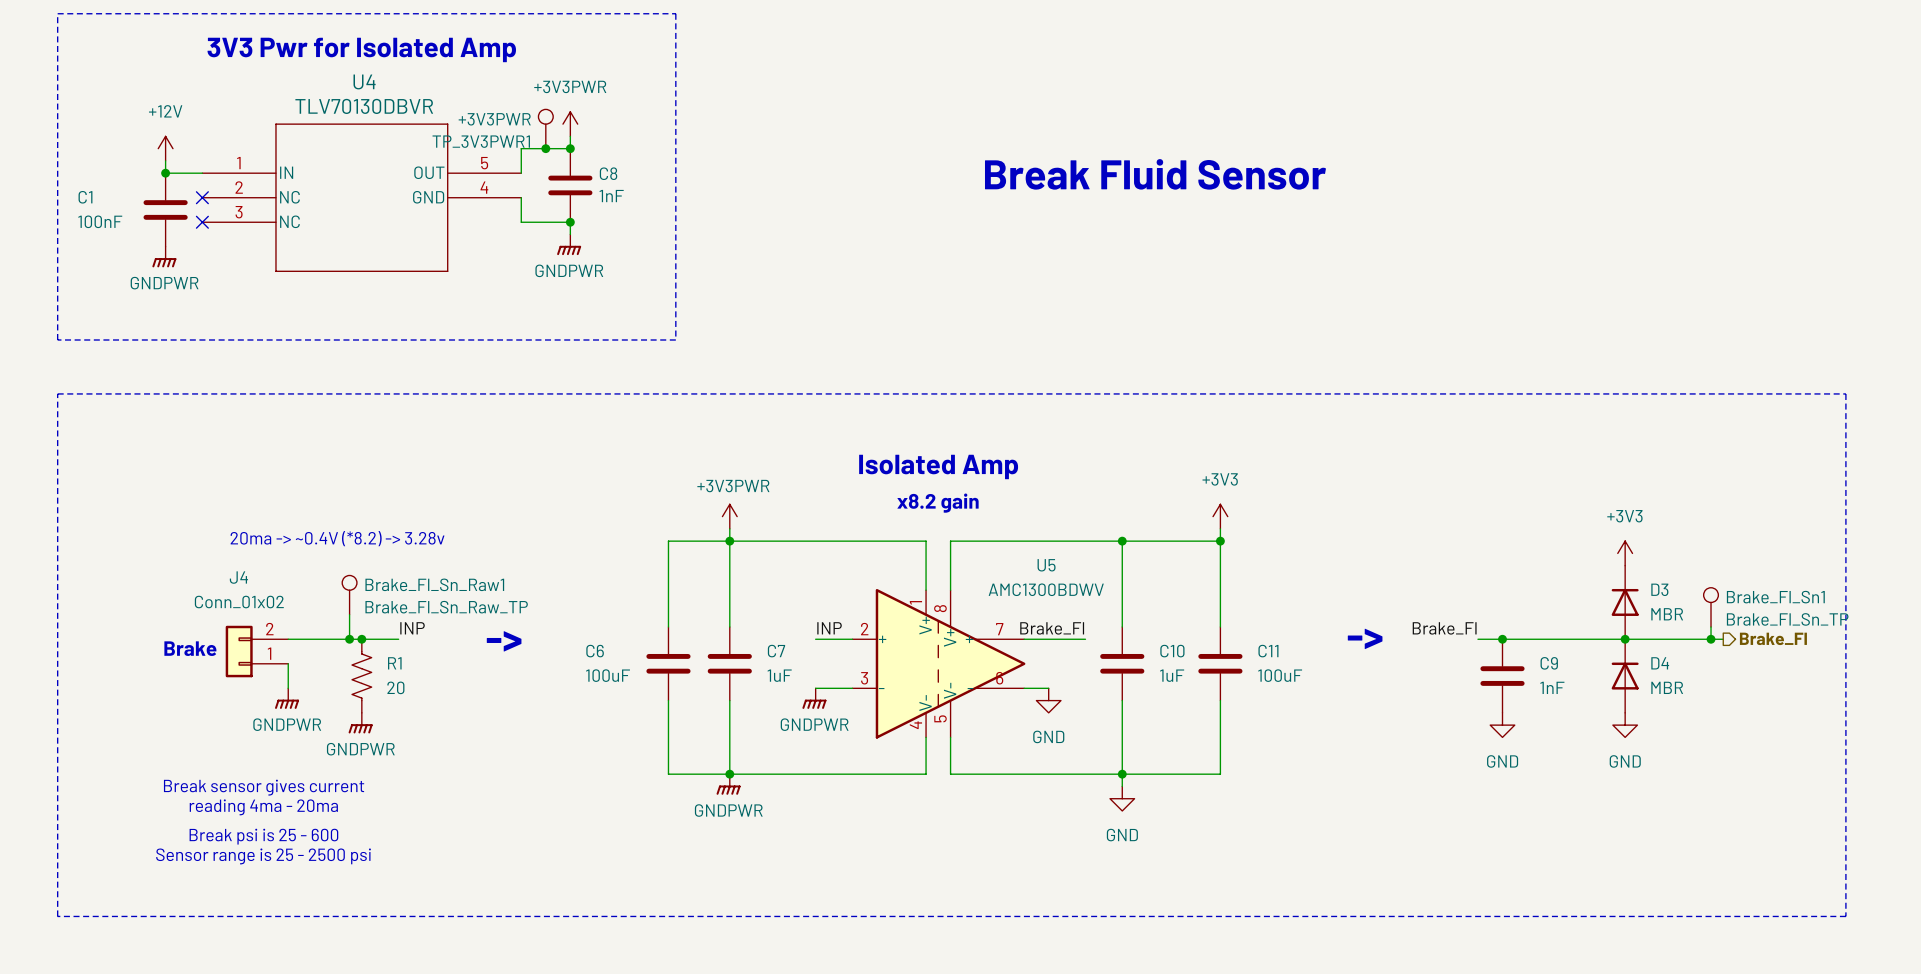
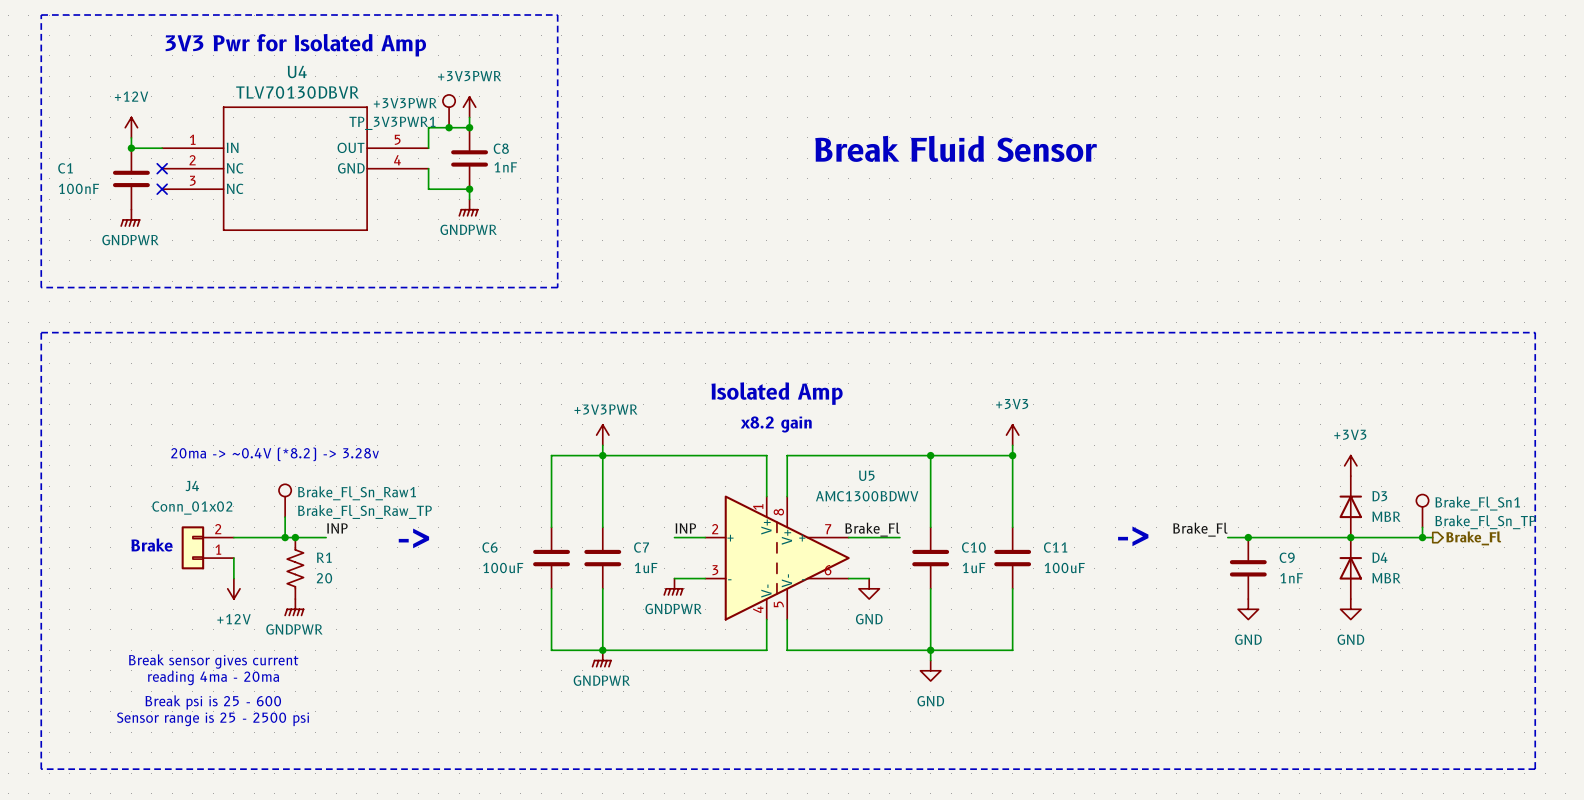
power symbol: GNDPWR (287, 698) -> +12V (233, 588)

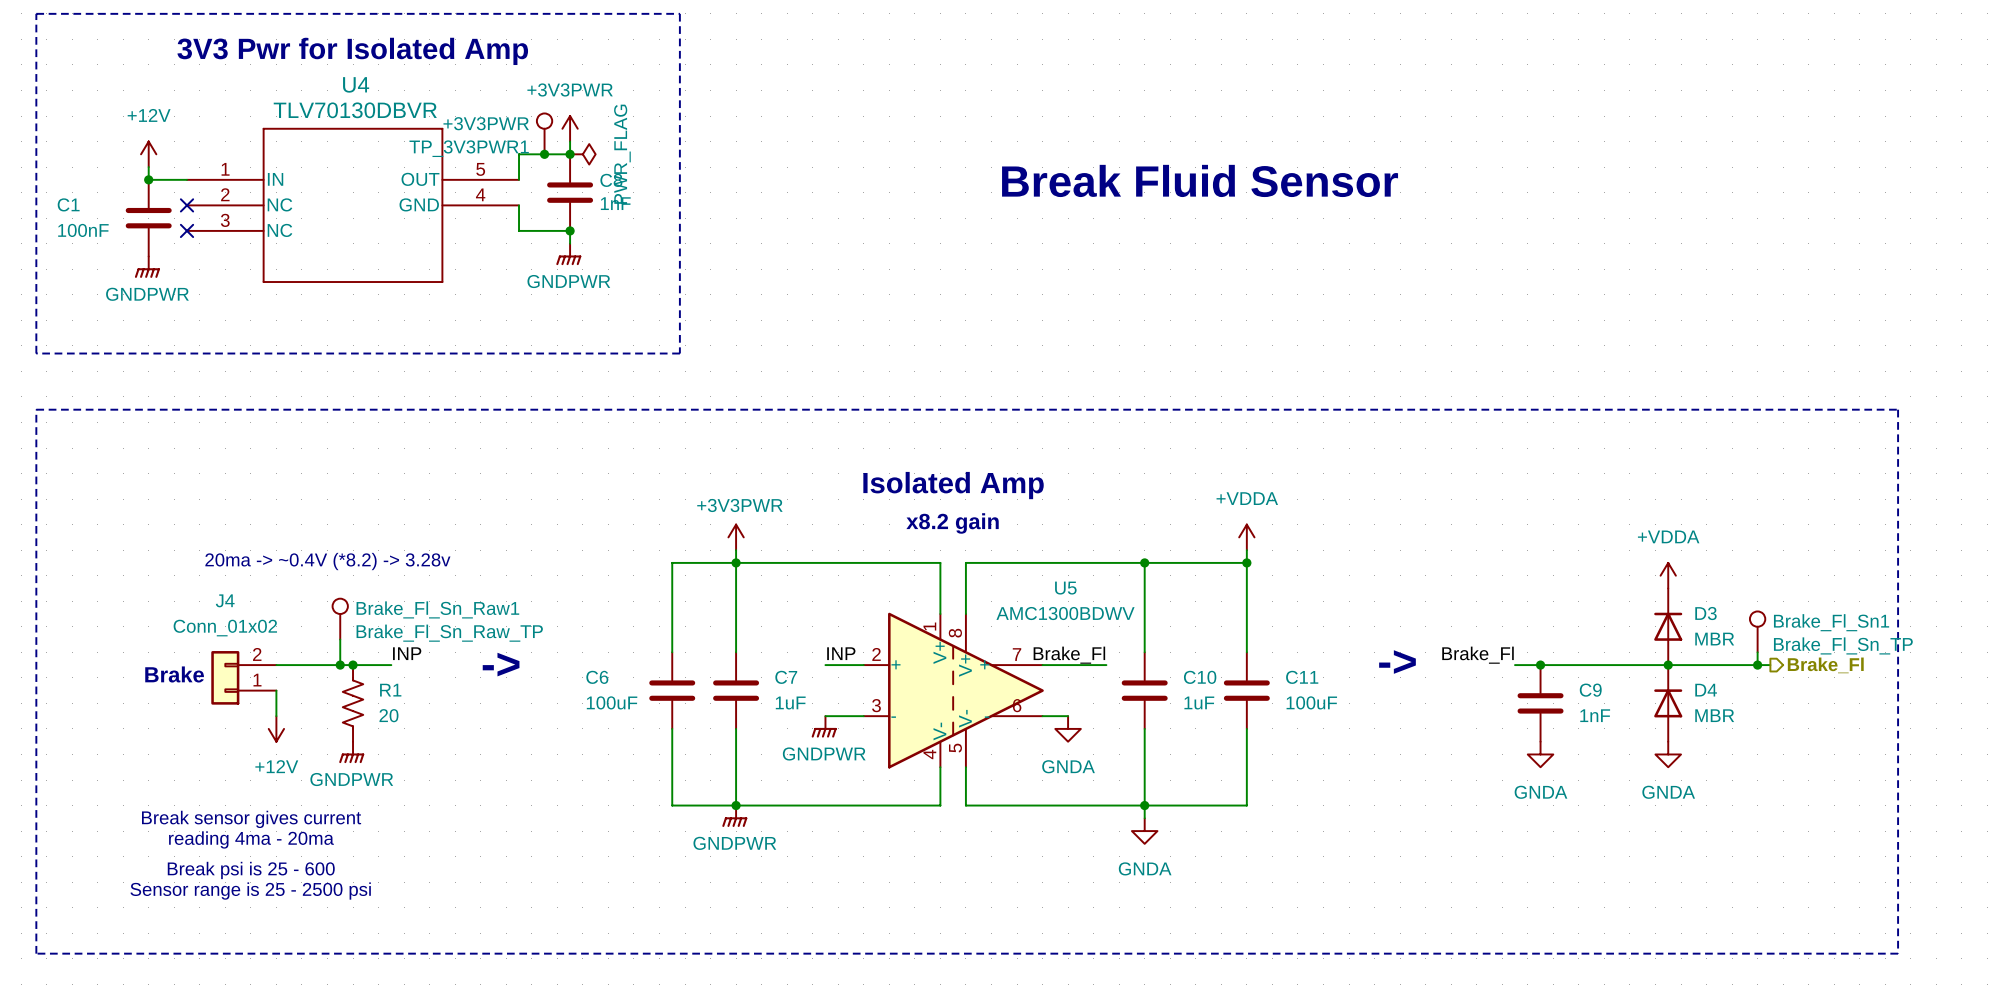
power symbol: none -> PWR_FLAG (582, 154)
power symbol: +3V3 (1012, 435) -> +VDDA (1246, 537)
power symbol: +3V3 (1350, 465) -> +VDDA (1668, 575)
power symbol: GND (869, 588) -> GNDA (1068, 728)
power symbol: GND (1248, 609) -> GNDA (1540, 754)
power symbol: GND (1350, 609) -> GNDA (1668, 754)
power symbol: GND (930, 670) -> GNDA (1144, 831)

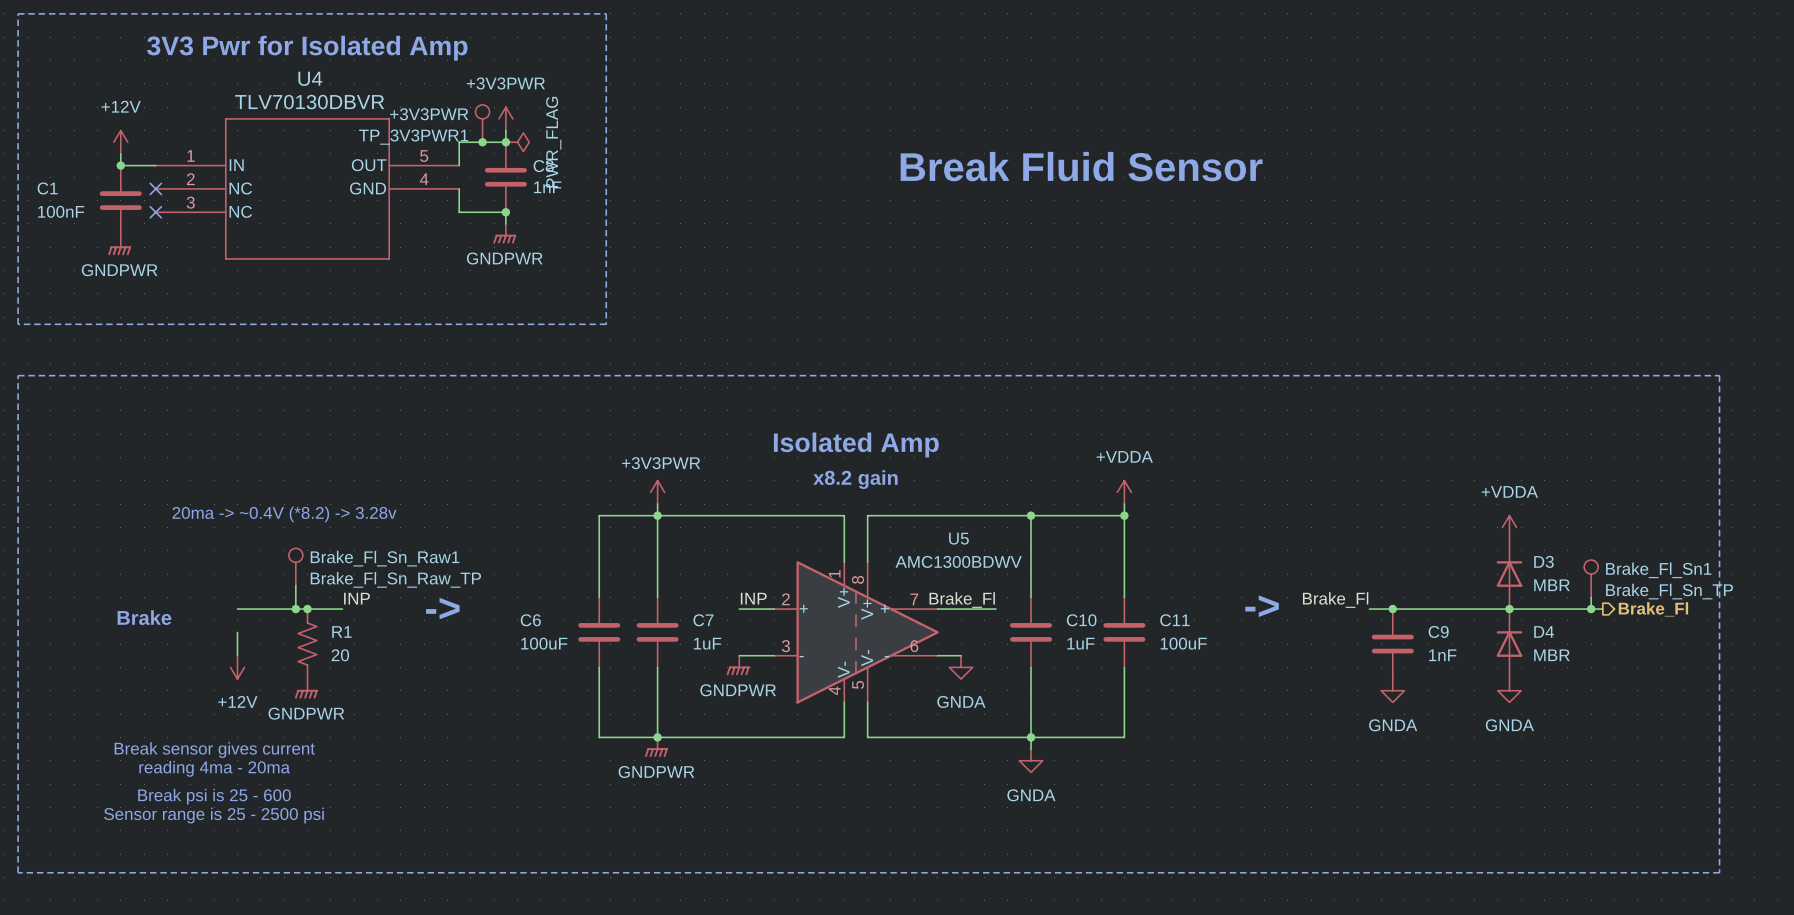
J4: Conn_01x02 (243, 677) -> none

